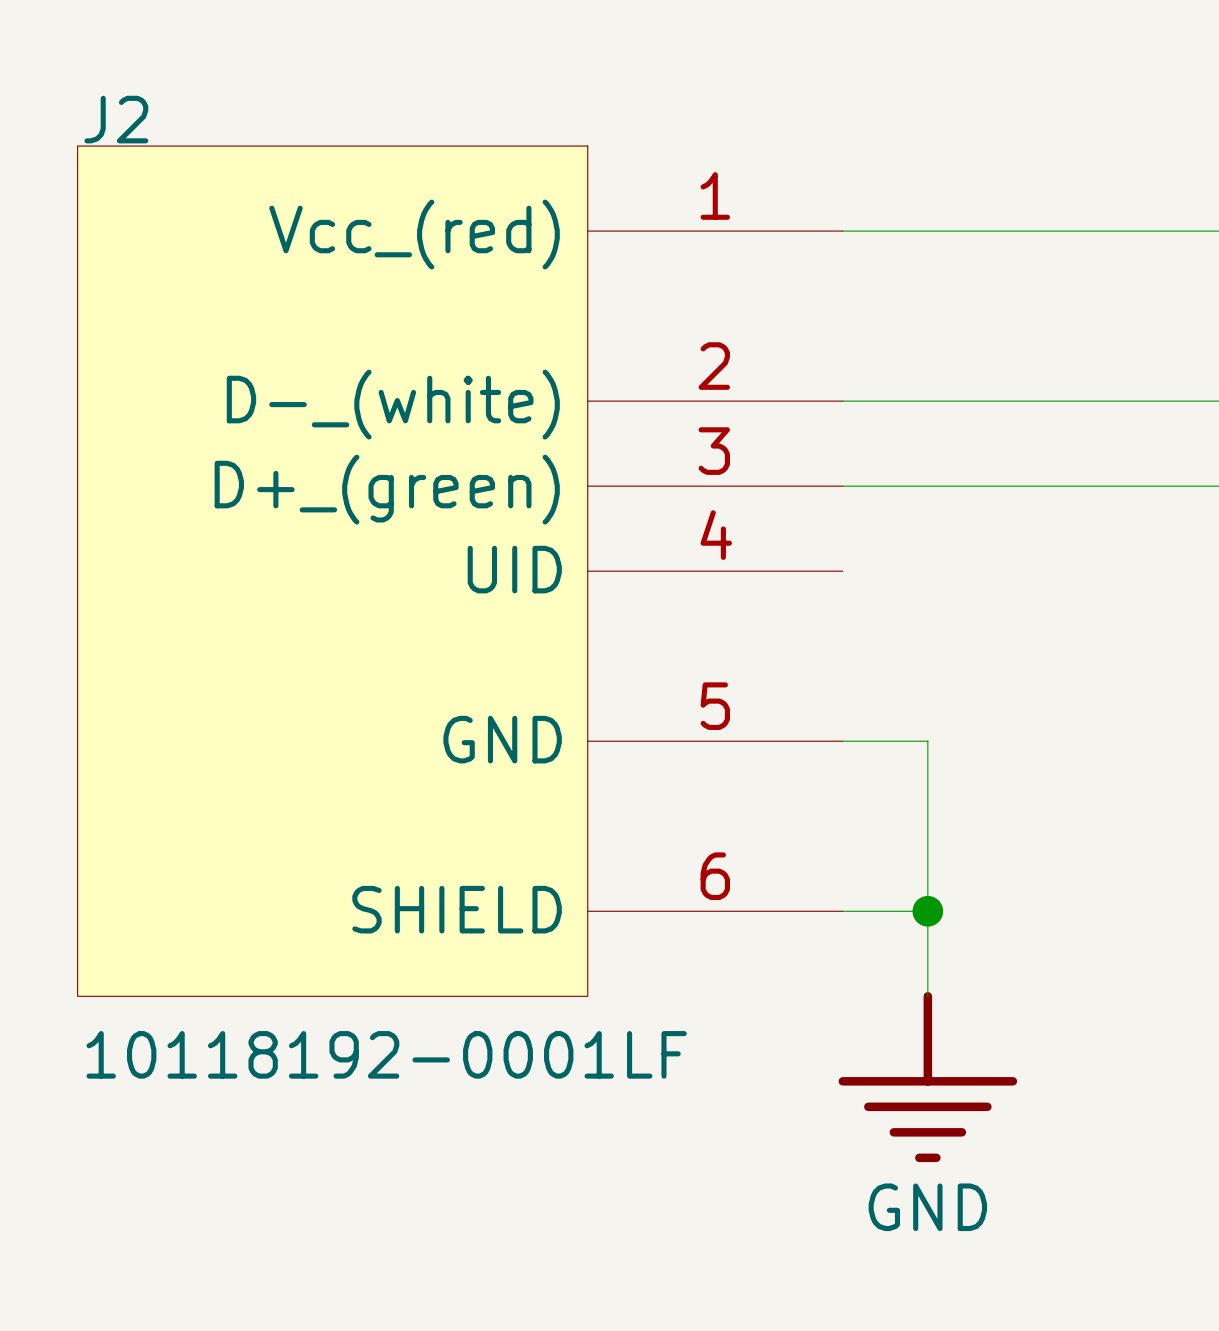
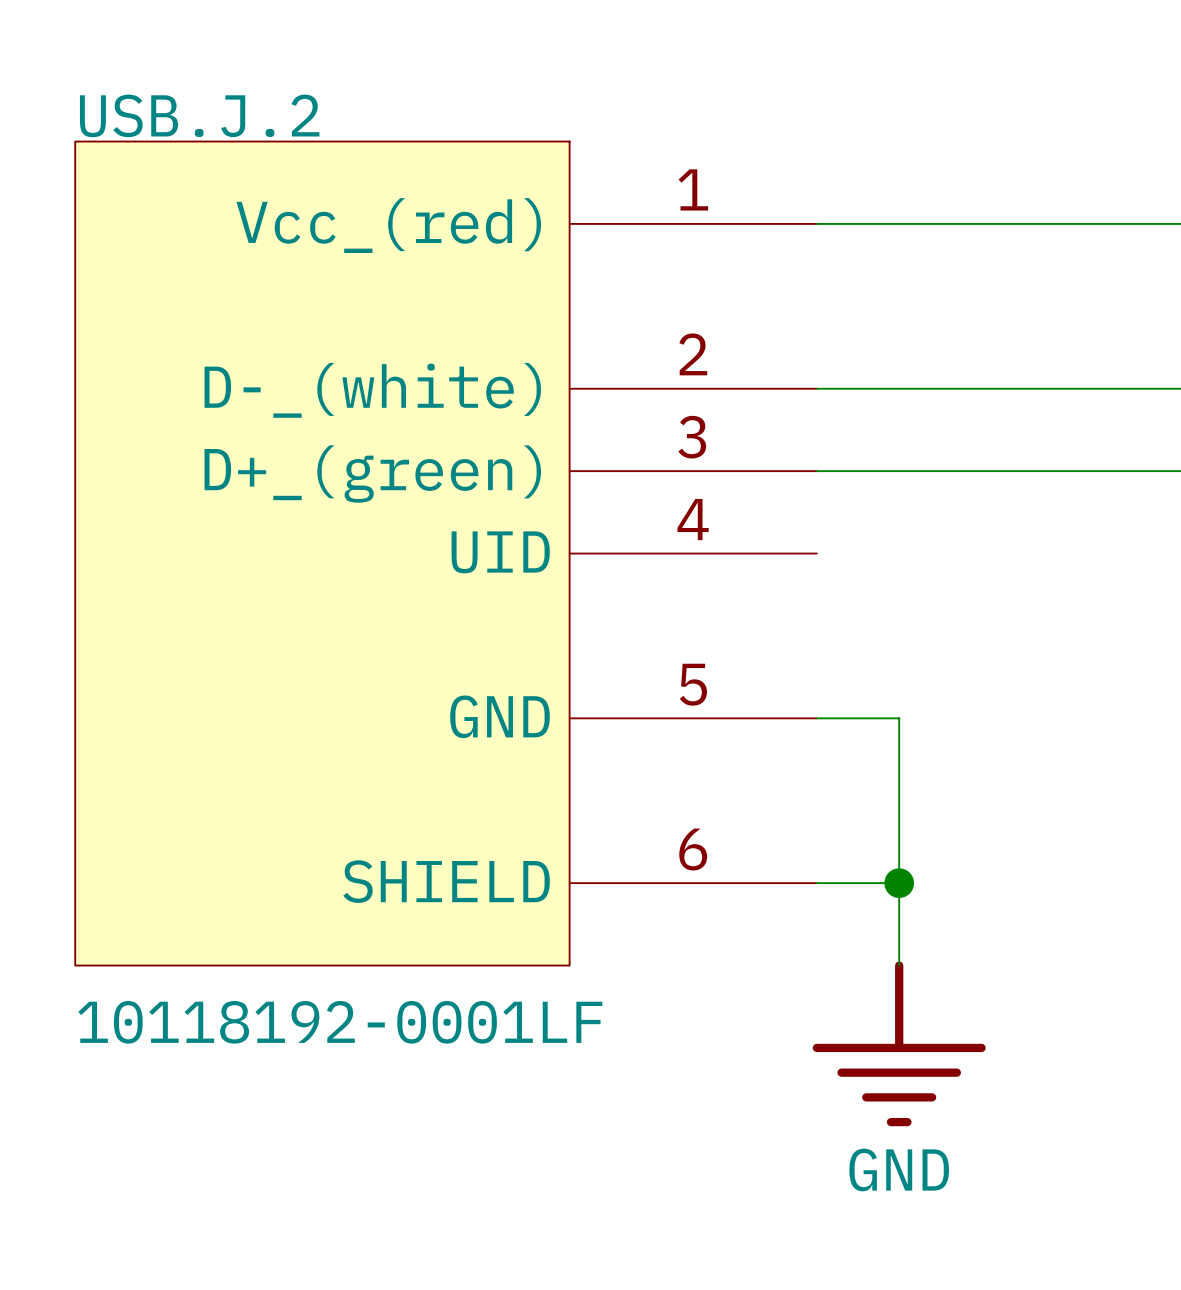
J2 name: J2 (116, 119) -> USB.J.2 (199, 115)

